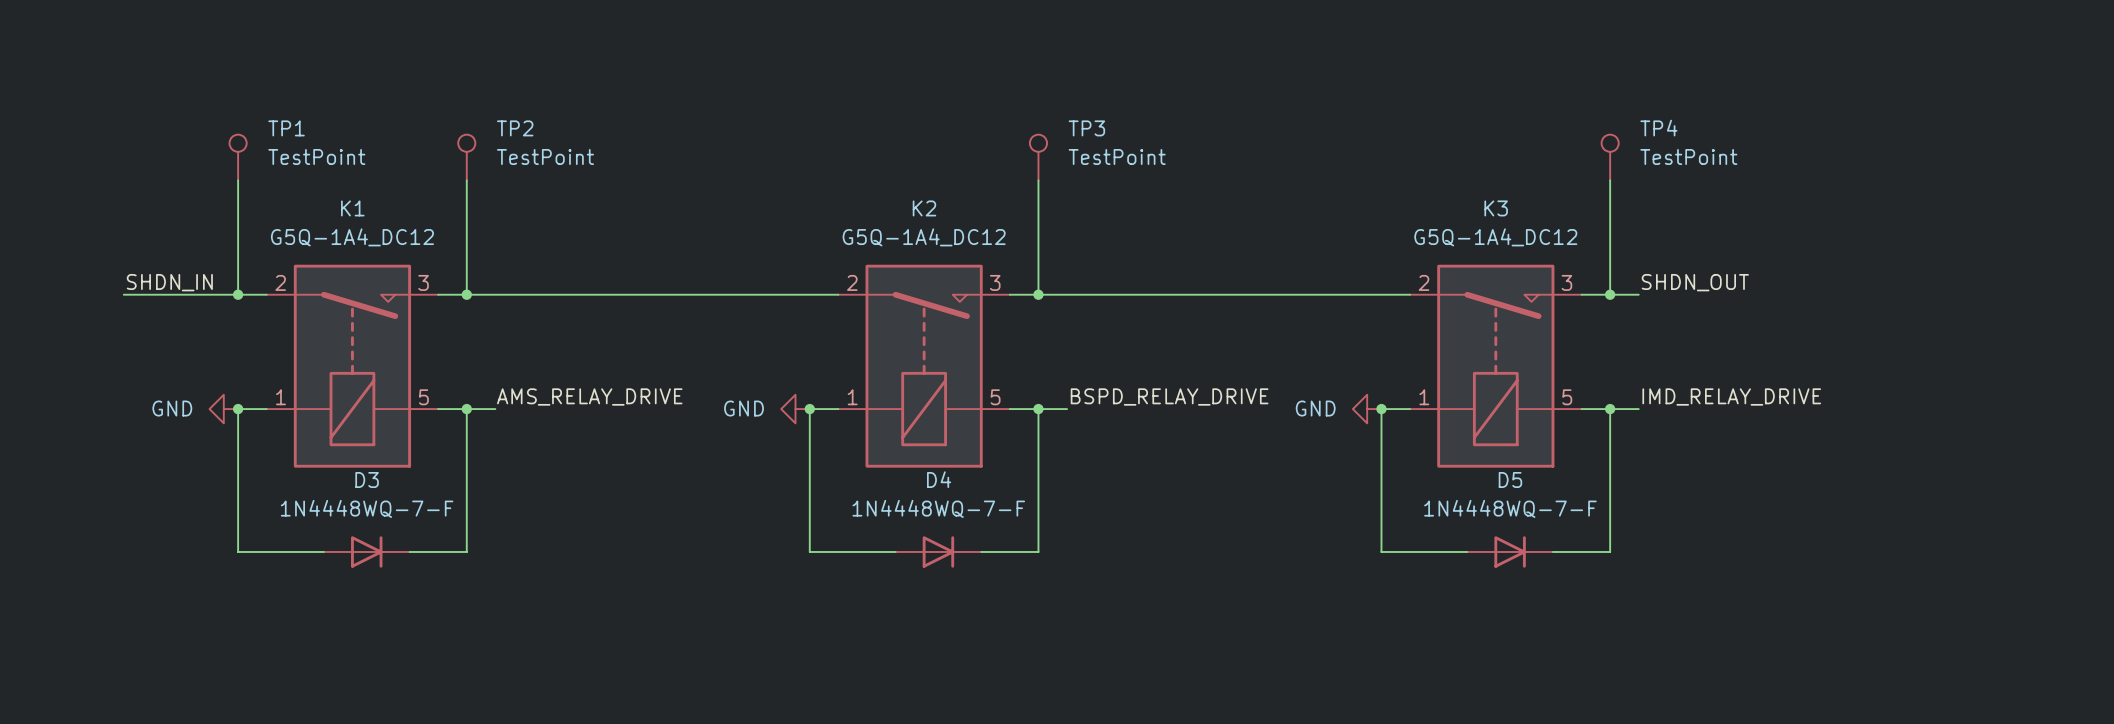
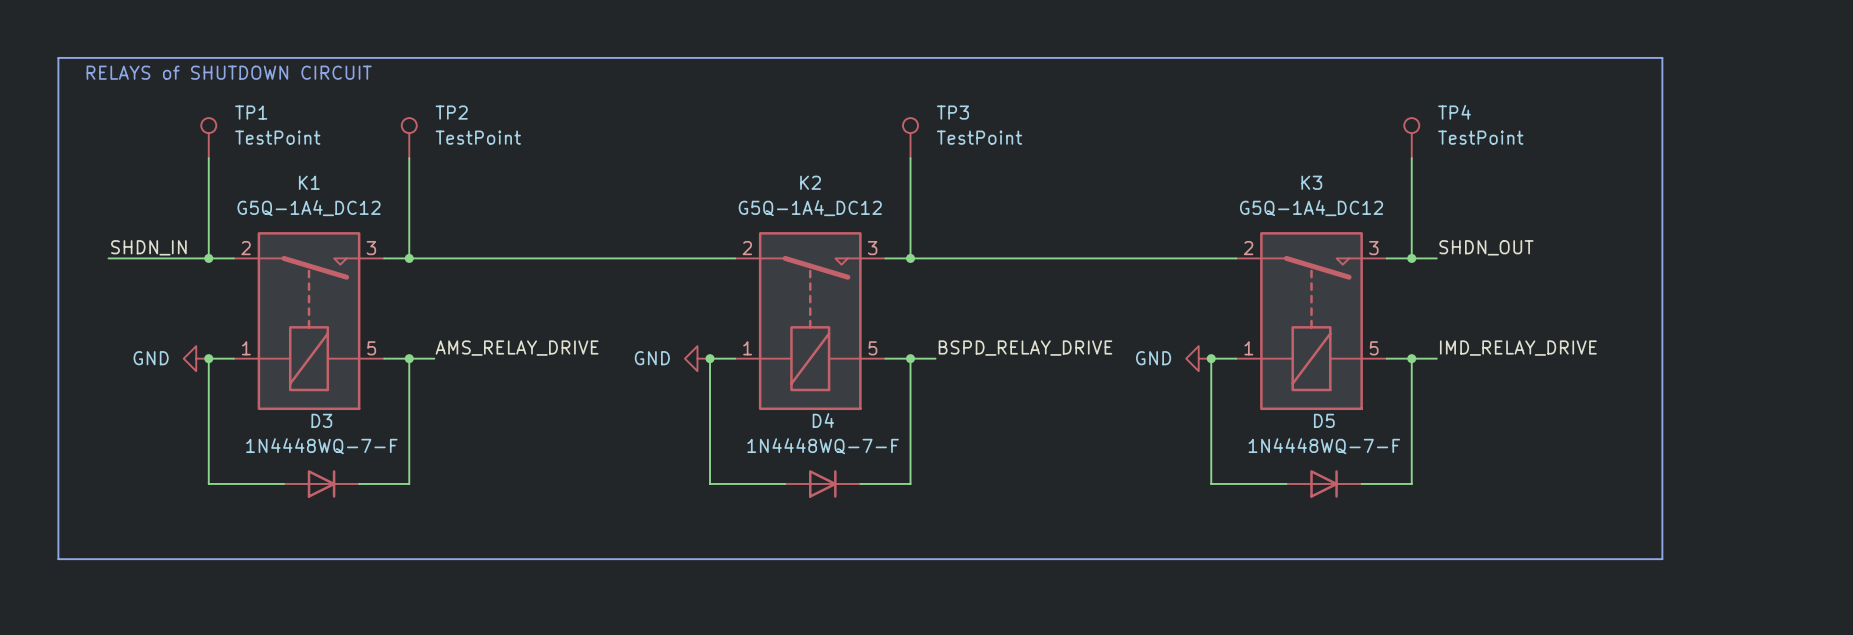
line: none -> (58, 57) (1662, 57) (1662, 559) (58, 559) (58, 57)
text: none -> RELAYS of SHUTDOWN CIRCUIT (229, 72)

